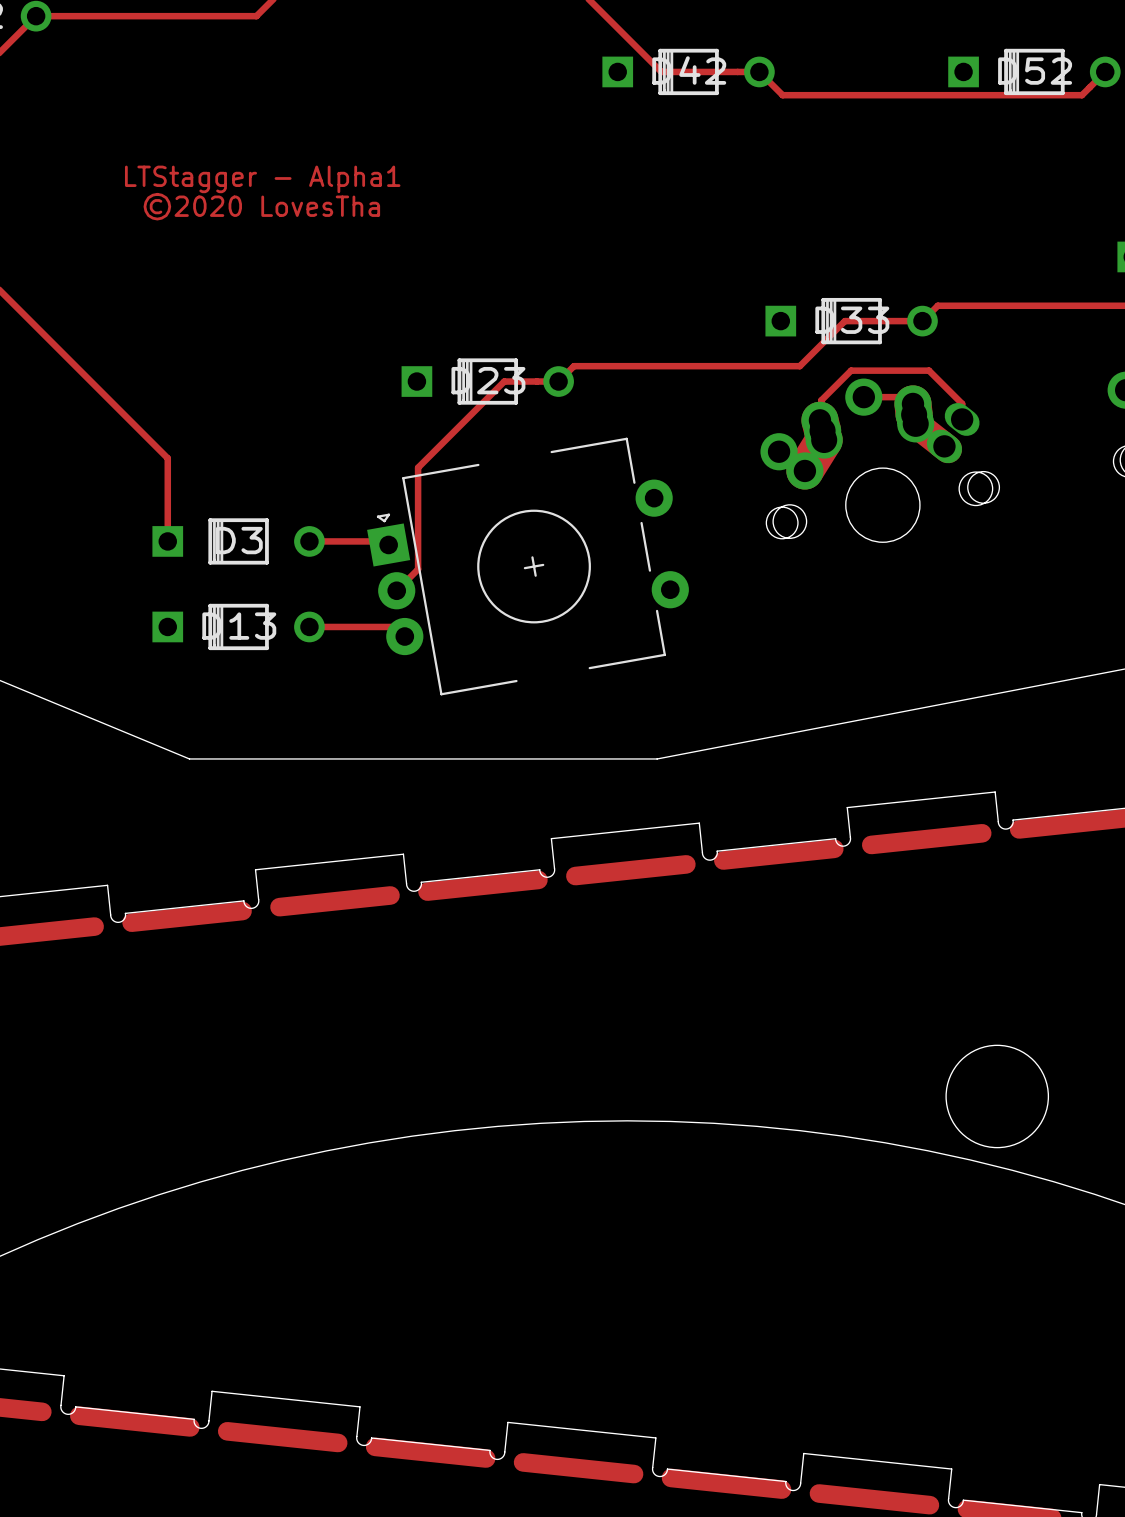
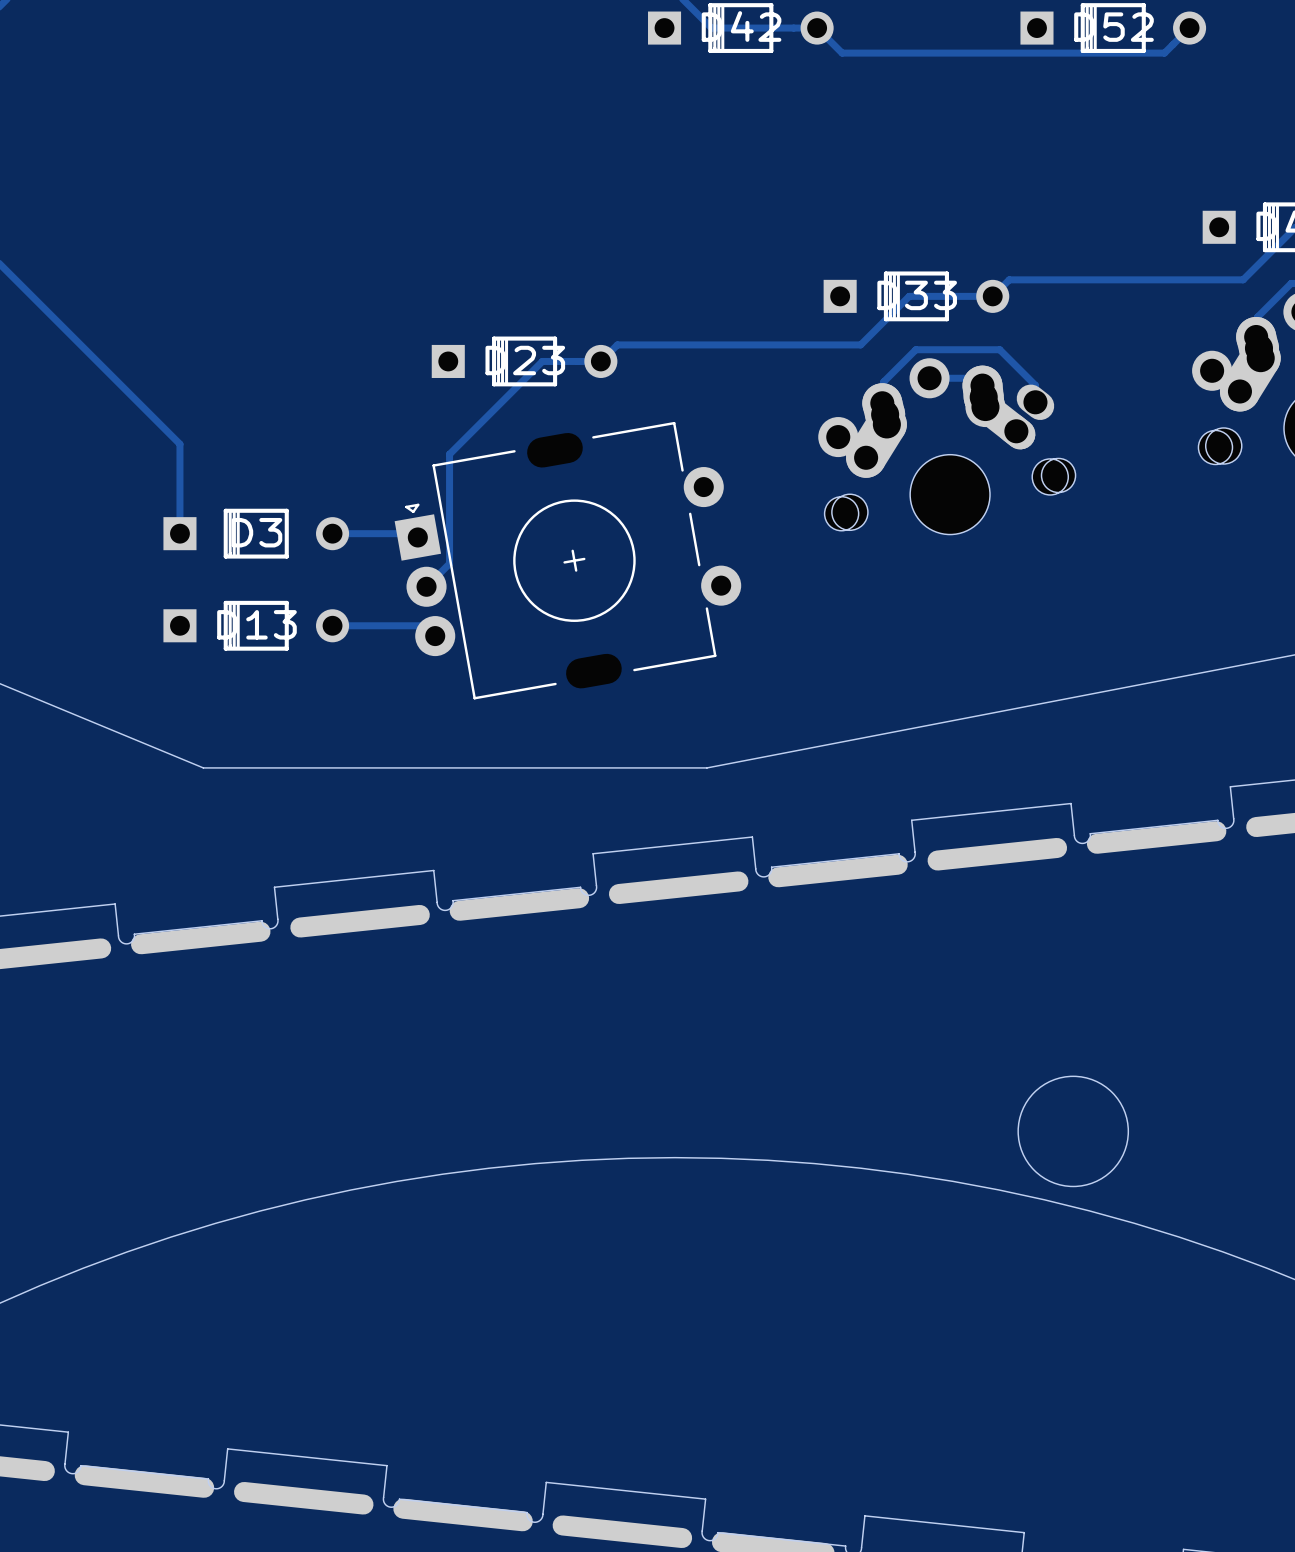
text: LTStagger - Alpha1 (262, 179) -> none
text: ©2020 LovesTha (261, 206) -> none

